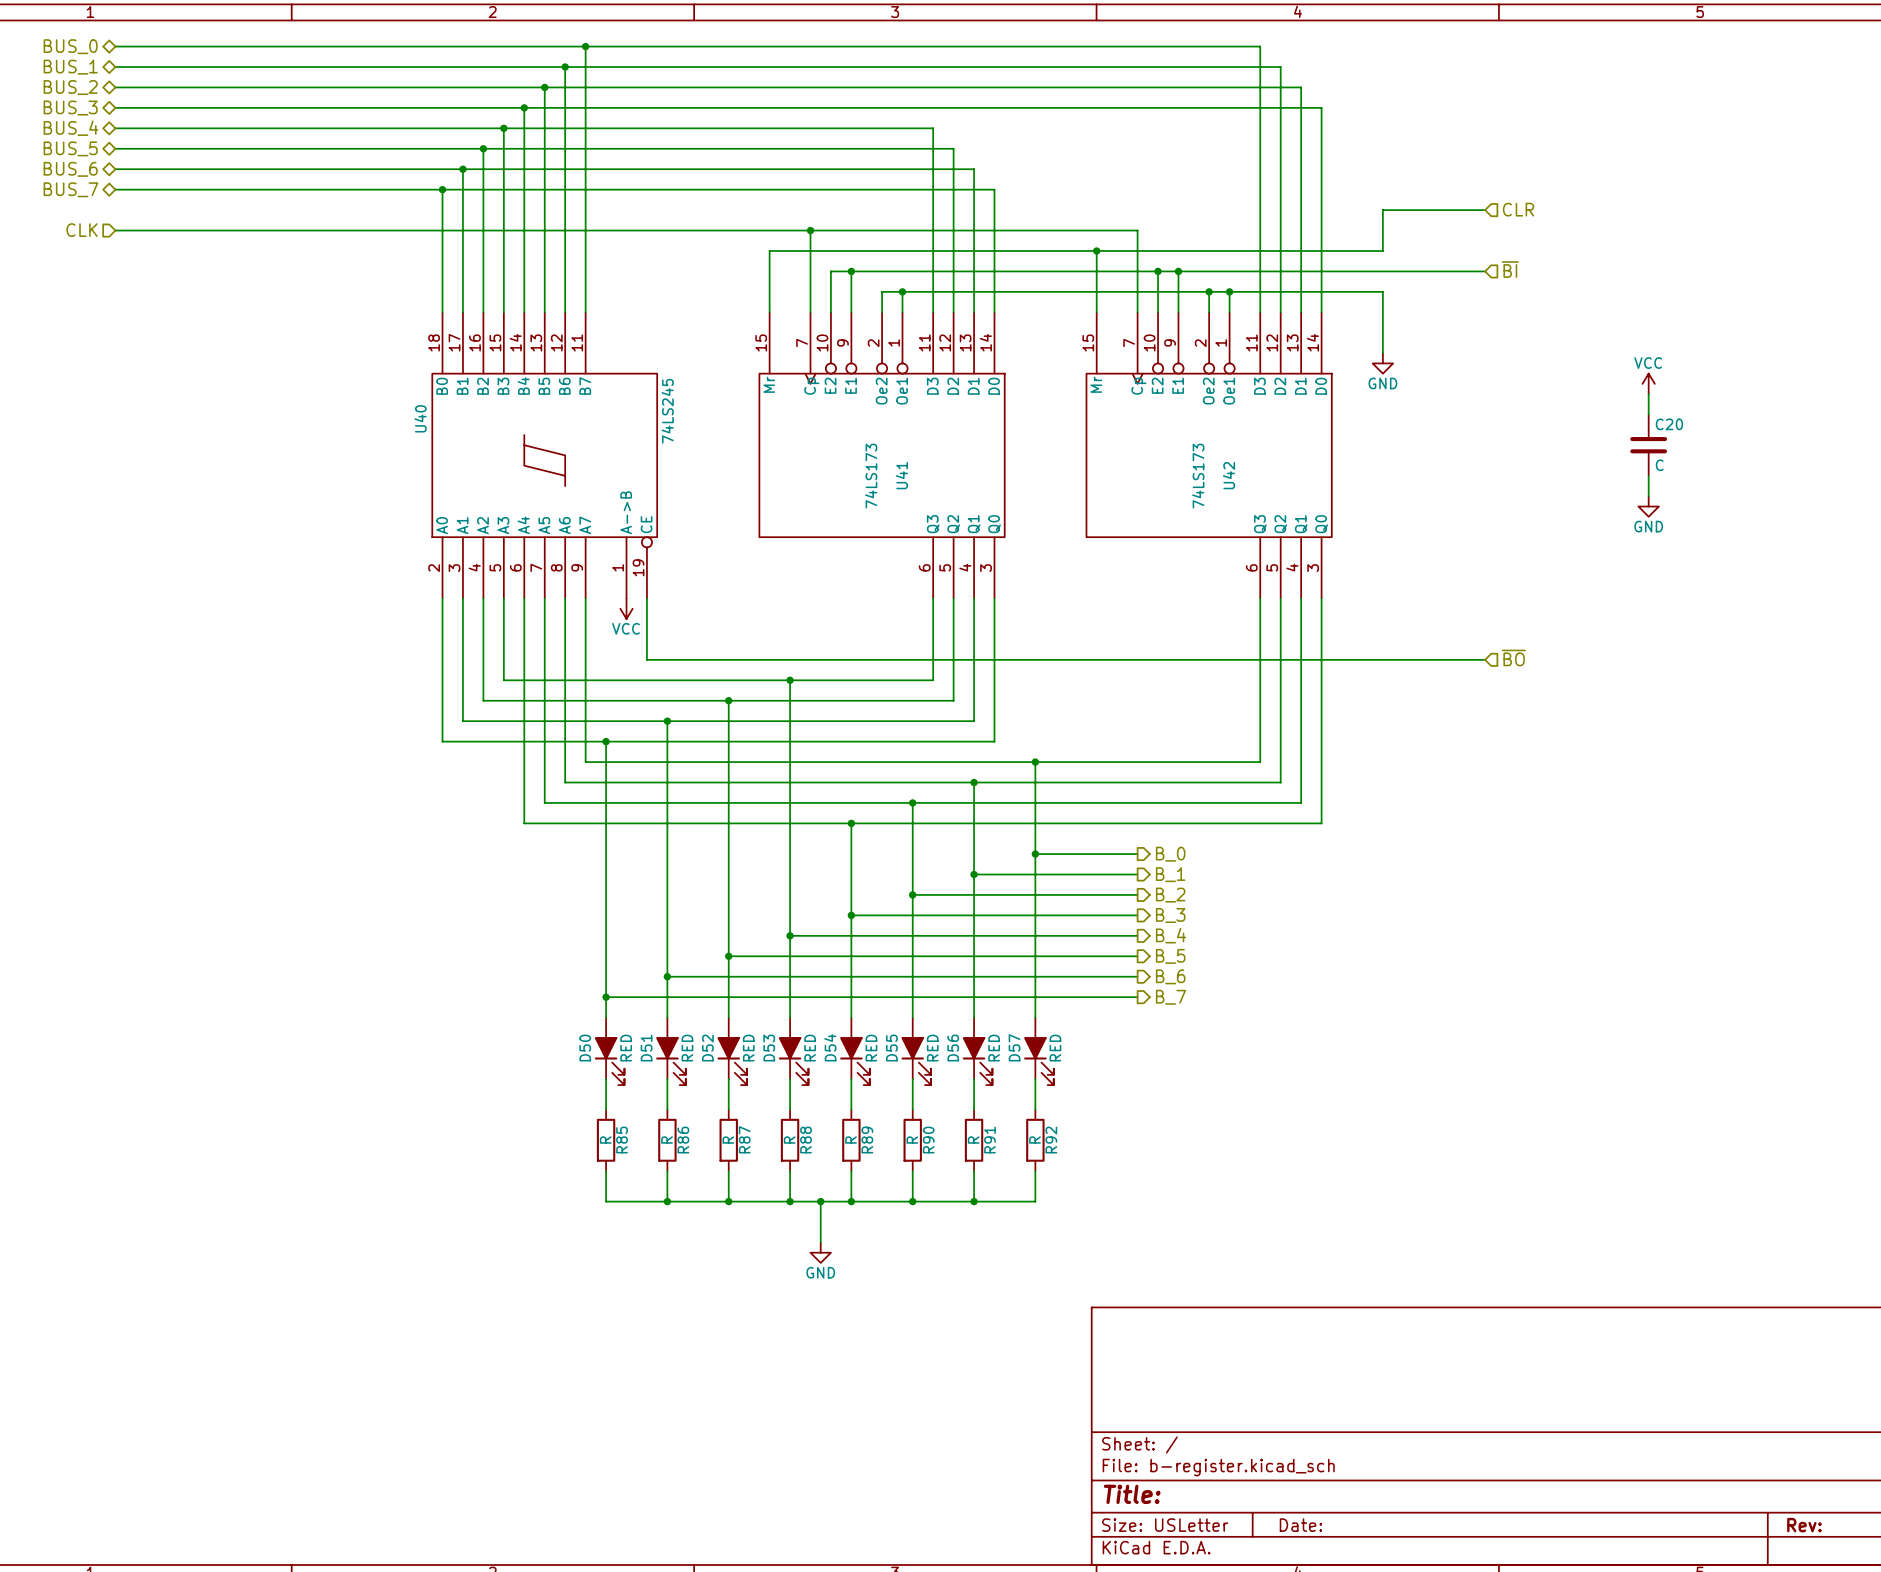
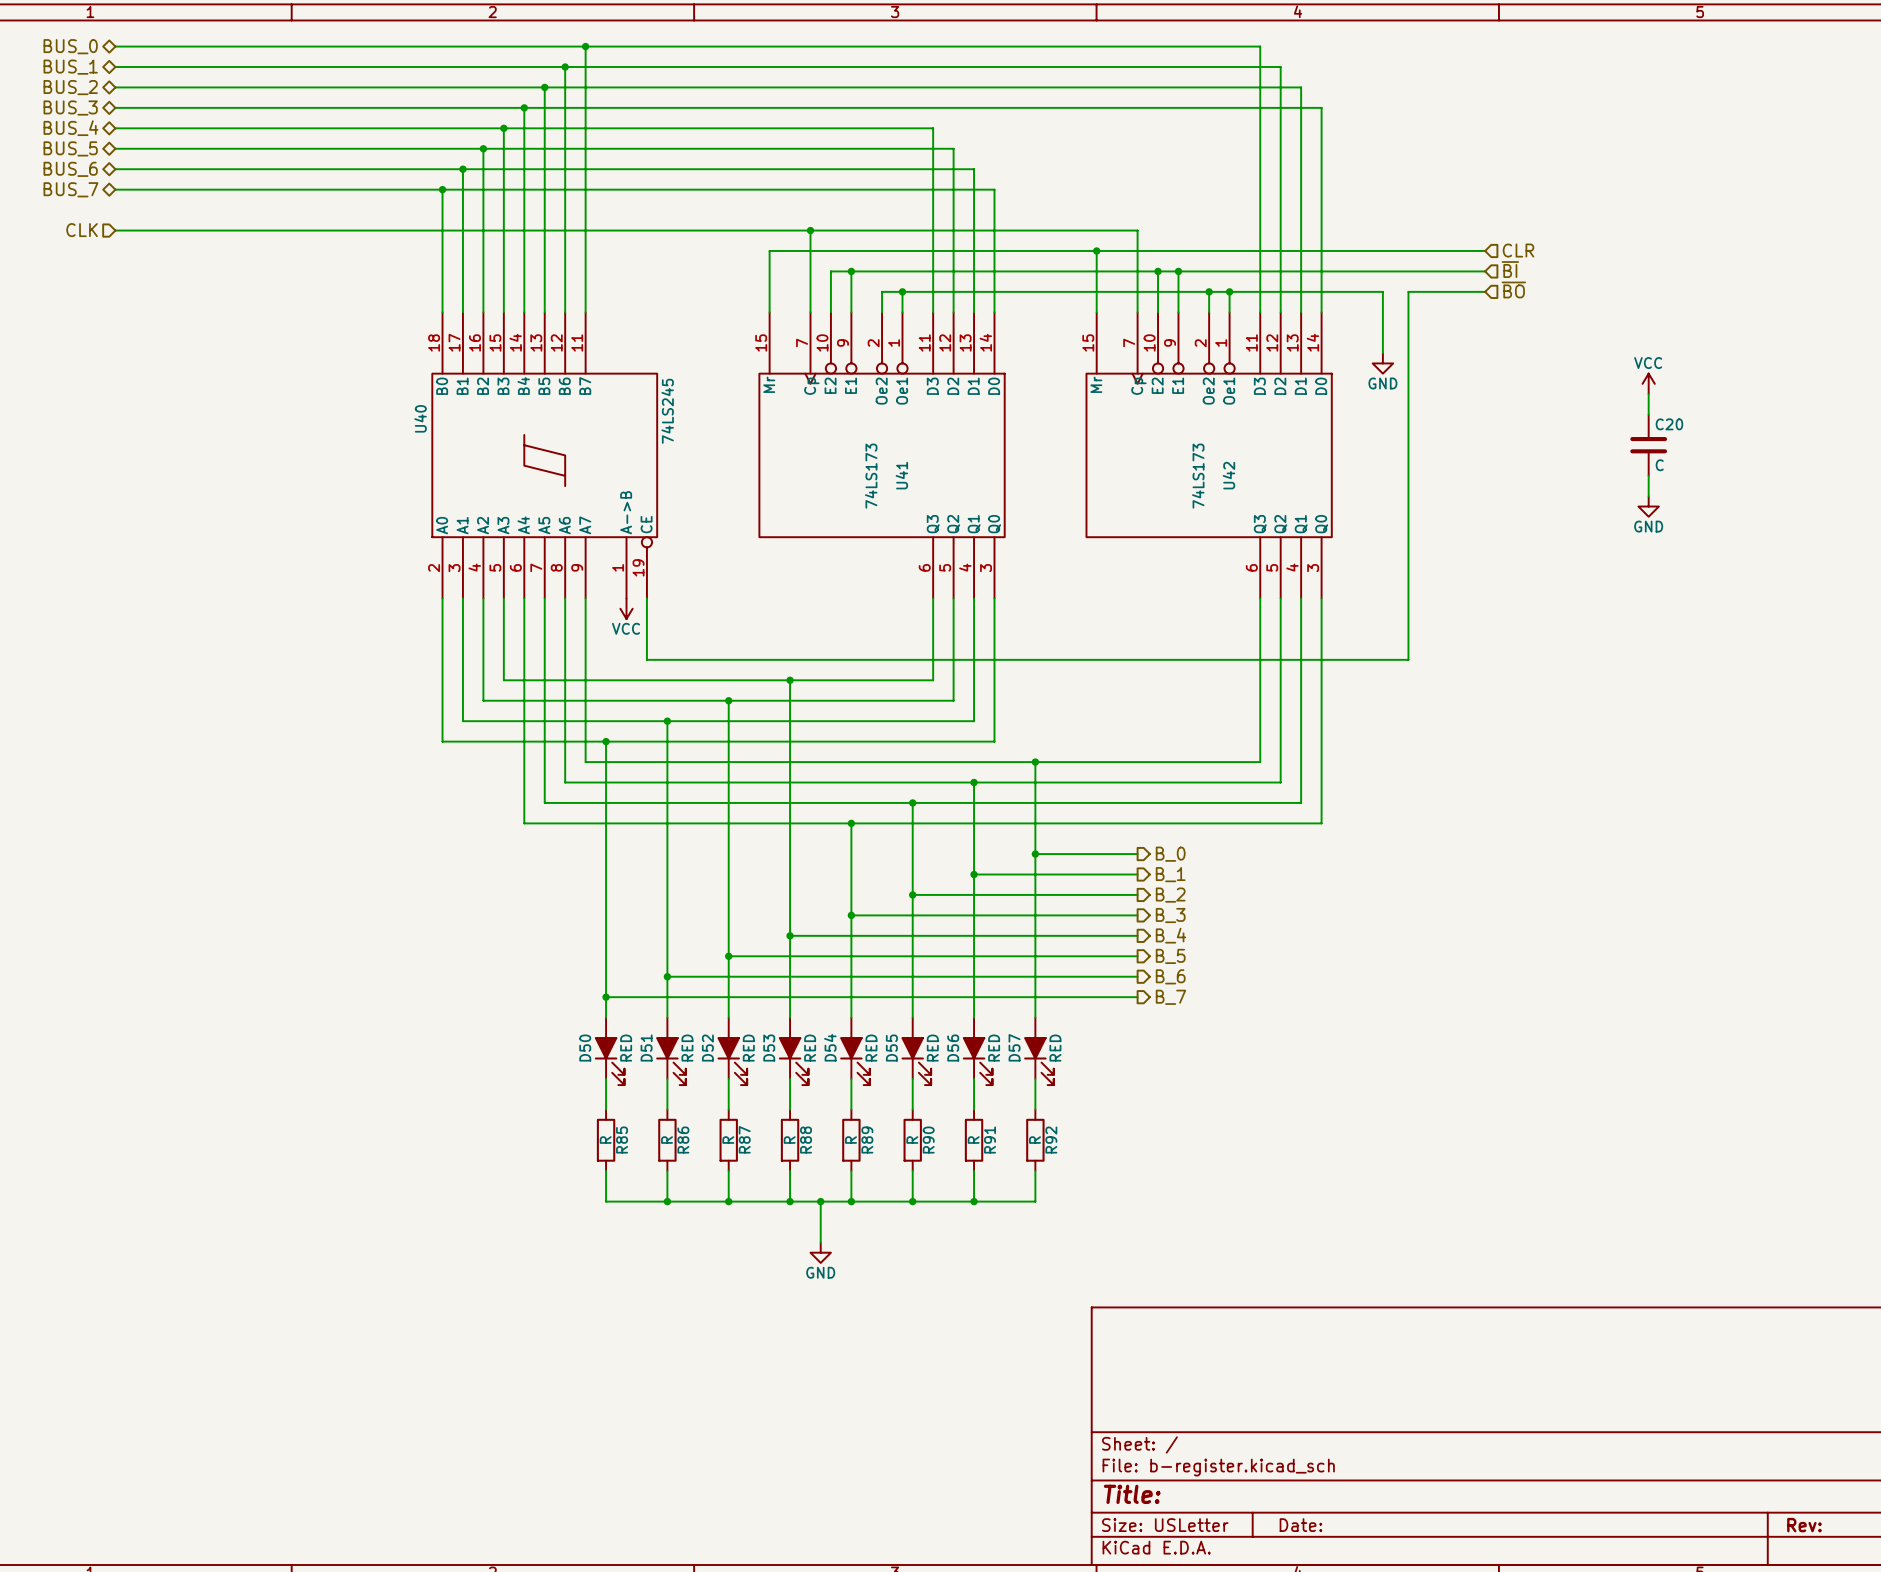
hierarchical label position: CLR (1518, 209) -> CLR (1518, 250)
wire: (1485, 210) (1382, 210) (1382, 250) -> (1485, 250) (1382, 250)
hierarchical label: none -> ~{BO} (1513, 290)
hierarchical label: ~{BO} (1513, 657) -> none
wire: (1408, 659) (1485, 659) -> (1408, 659) (1408, 291) (1485, 291)

